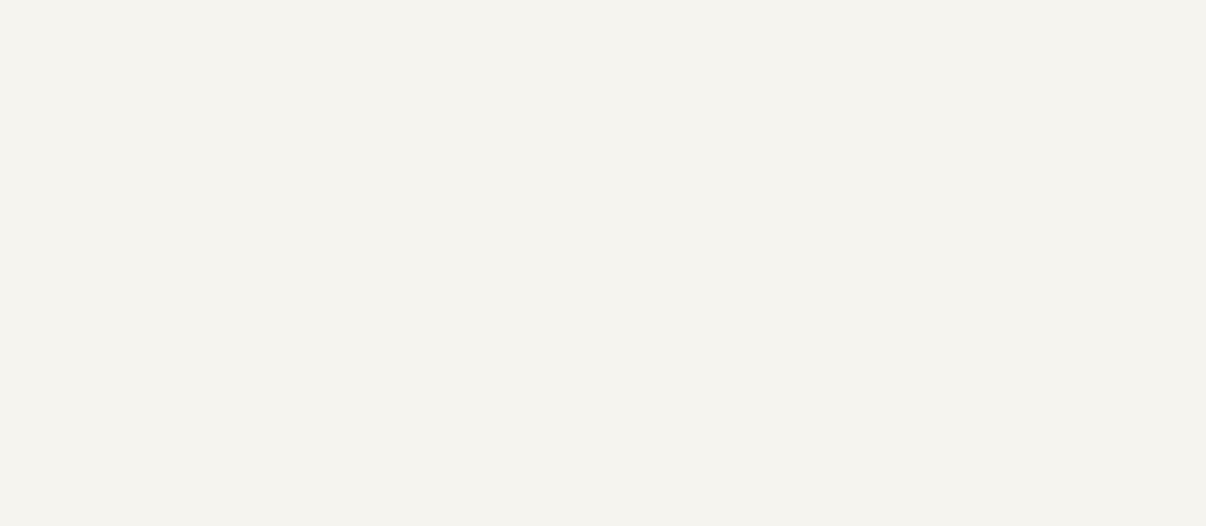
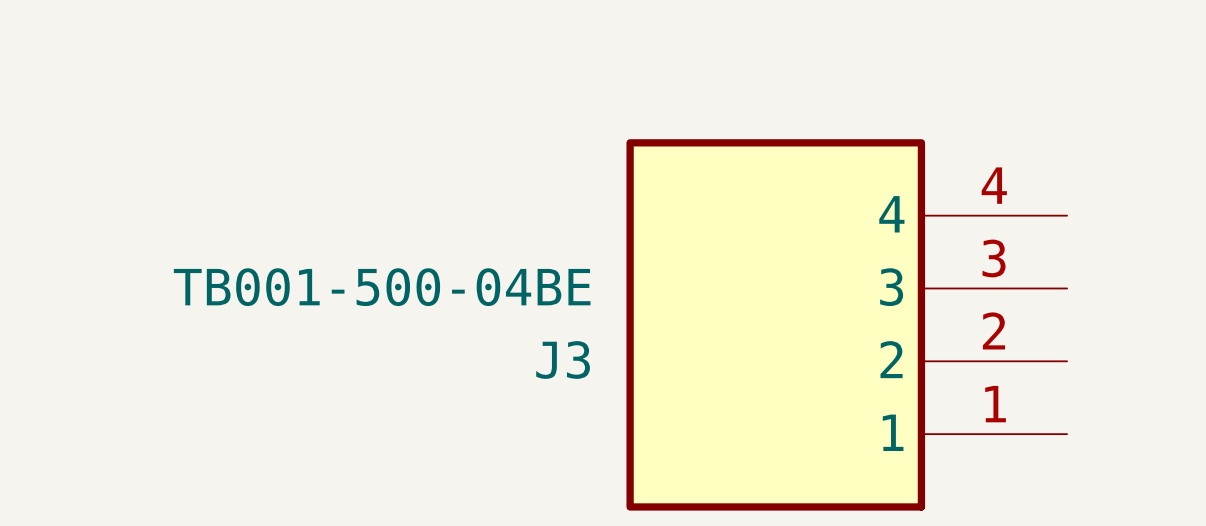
J3: none -> TB001-500-04BE (846, 324)

